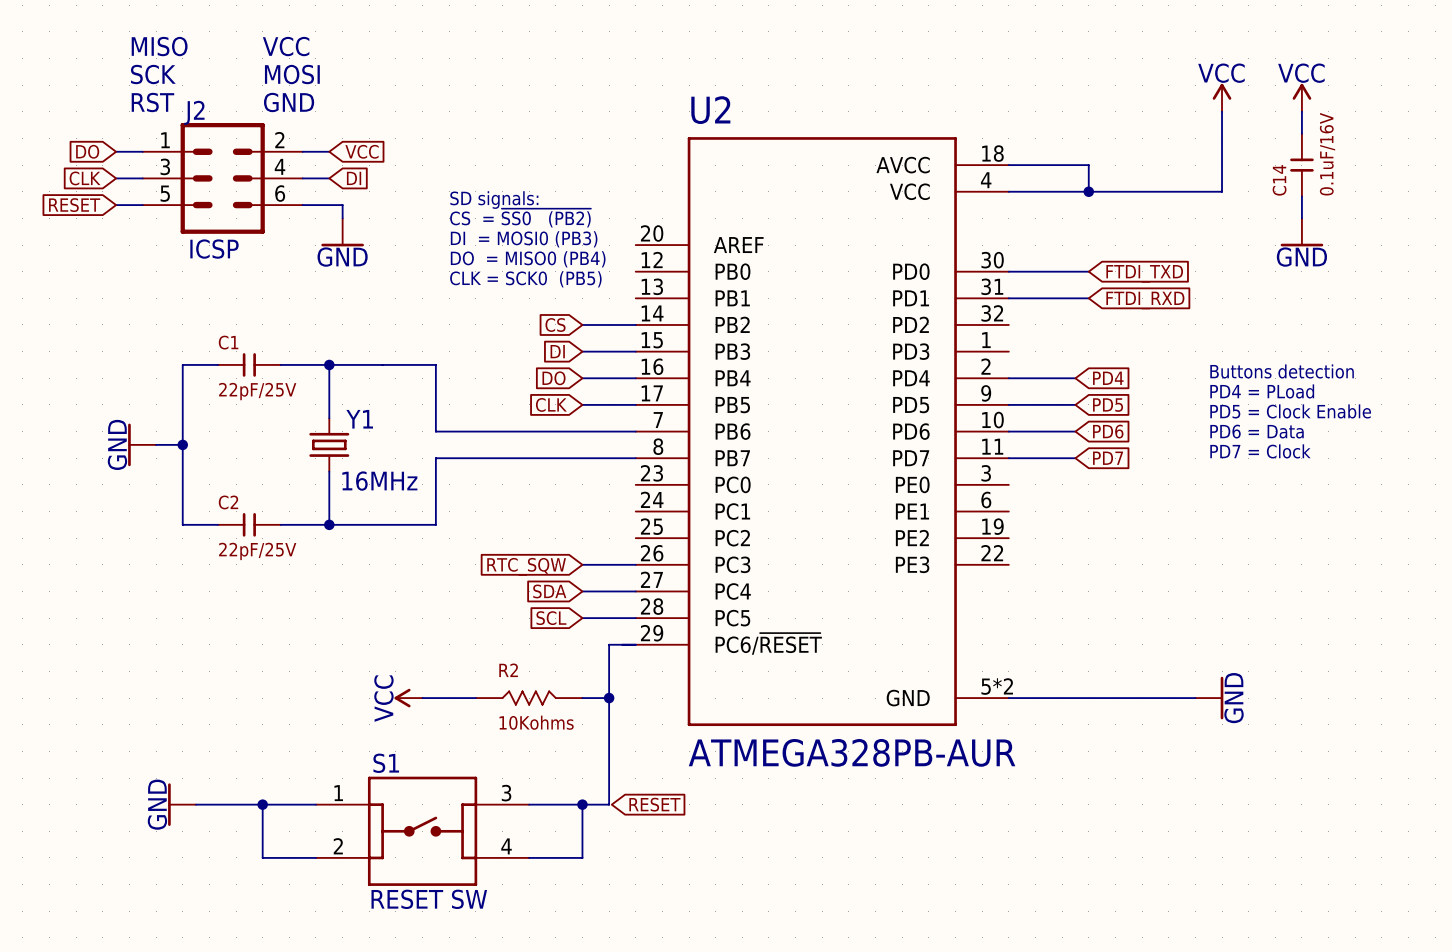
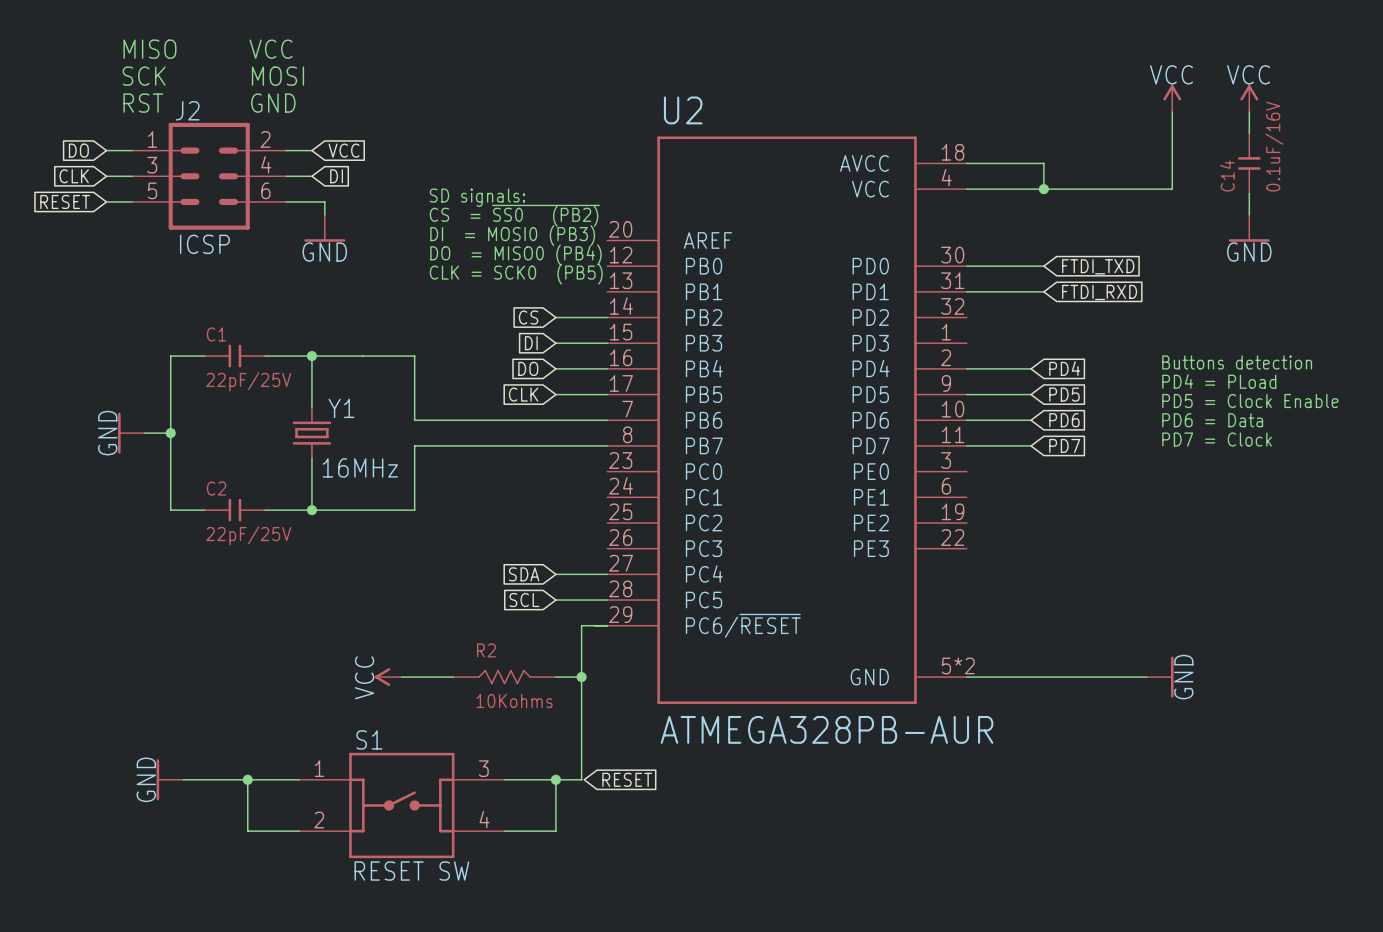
wire: (582, 564) (635, 564) -> none
global label: RTC_SQW (526, 566) -> none

